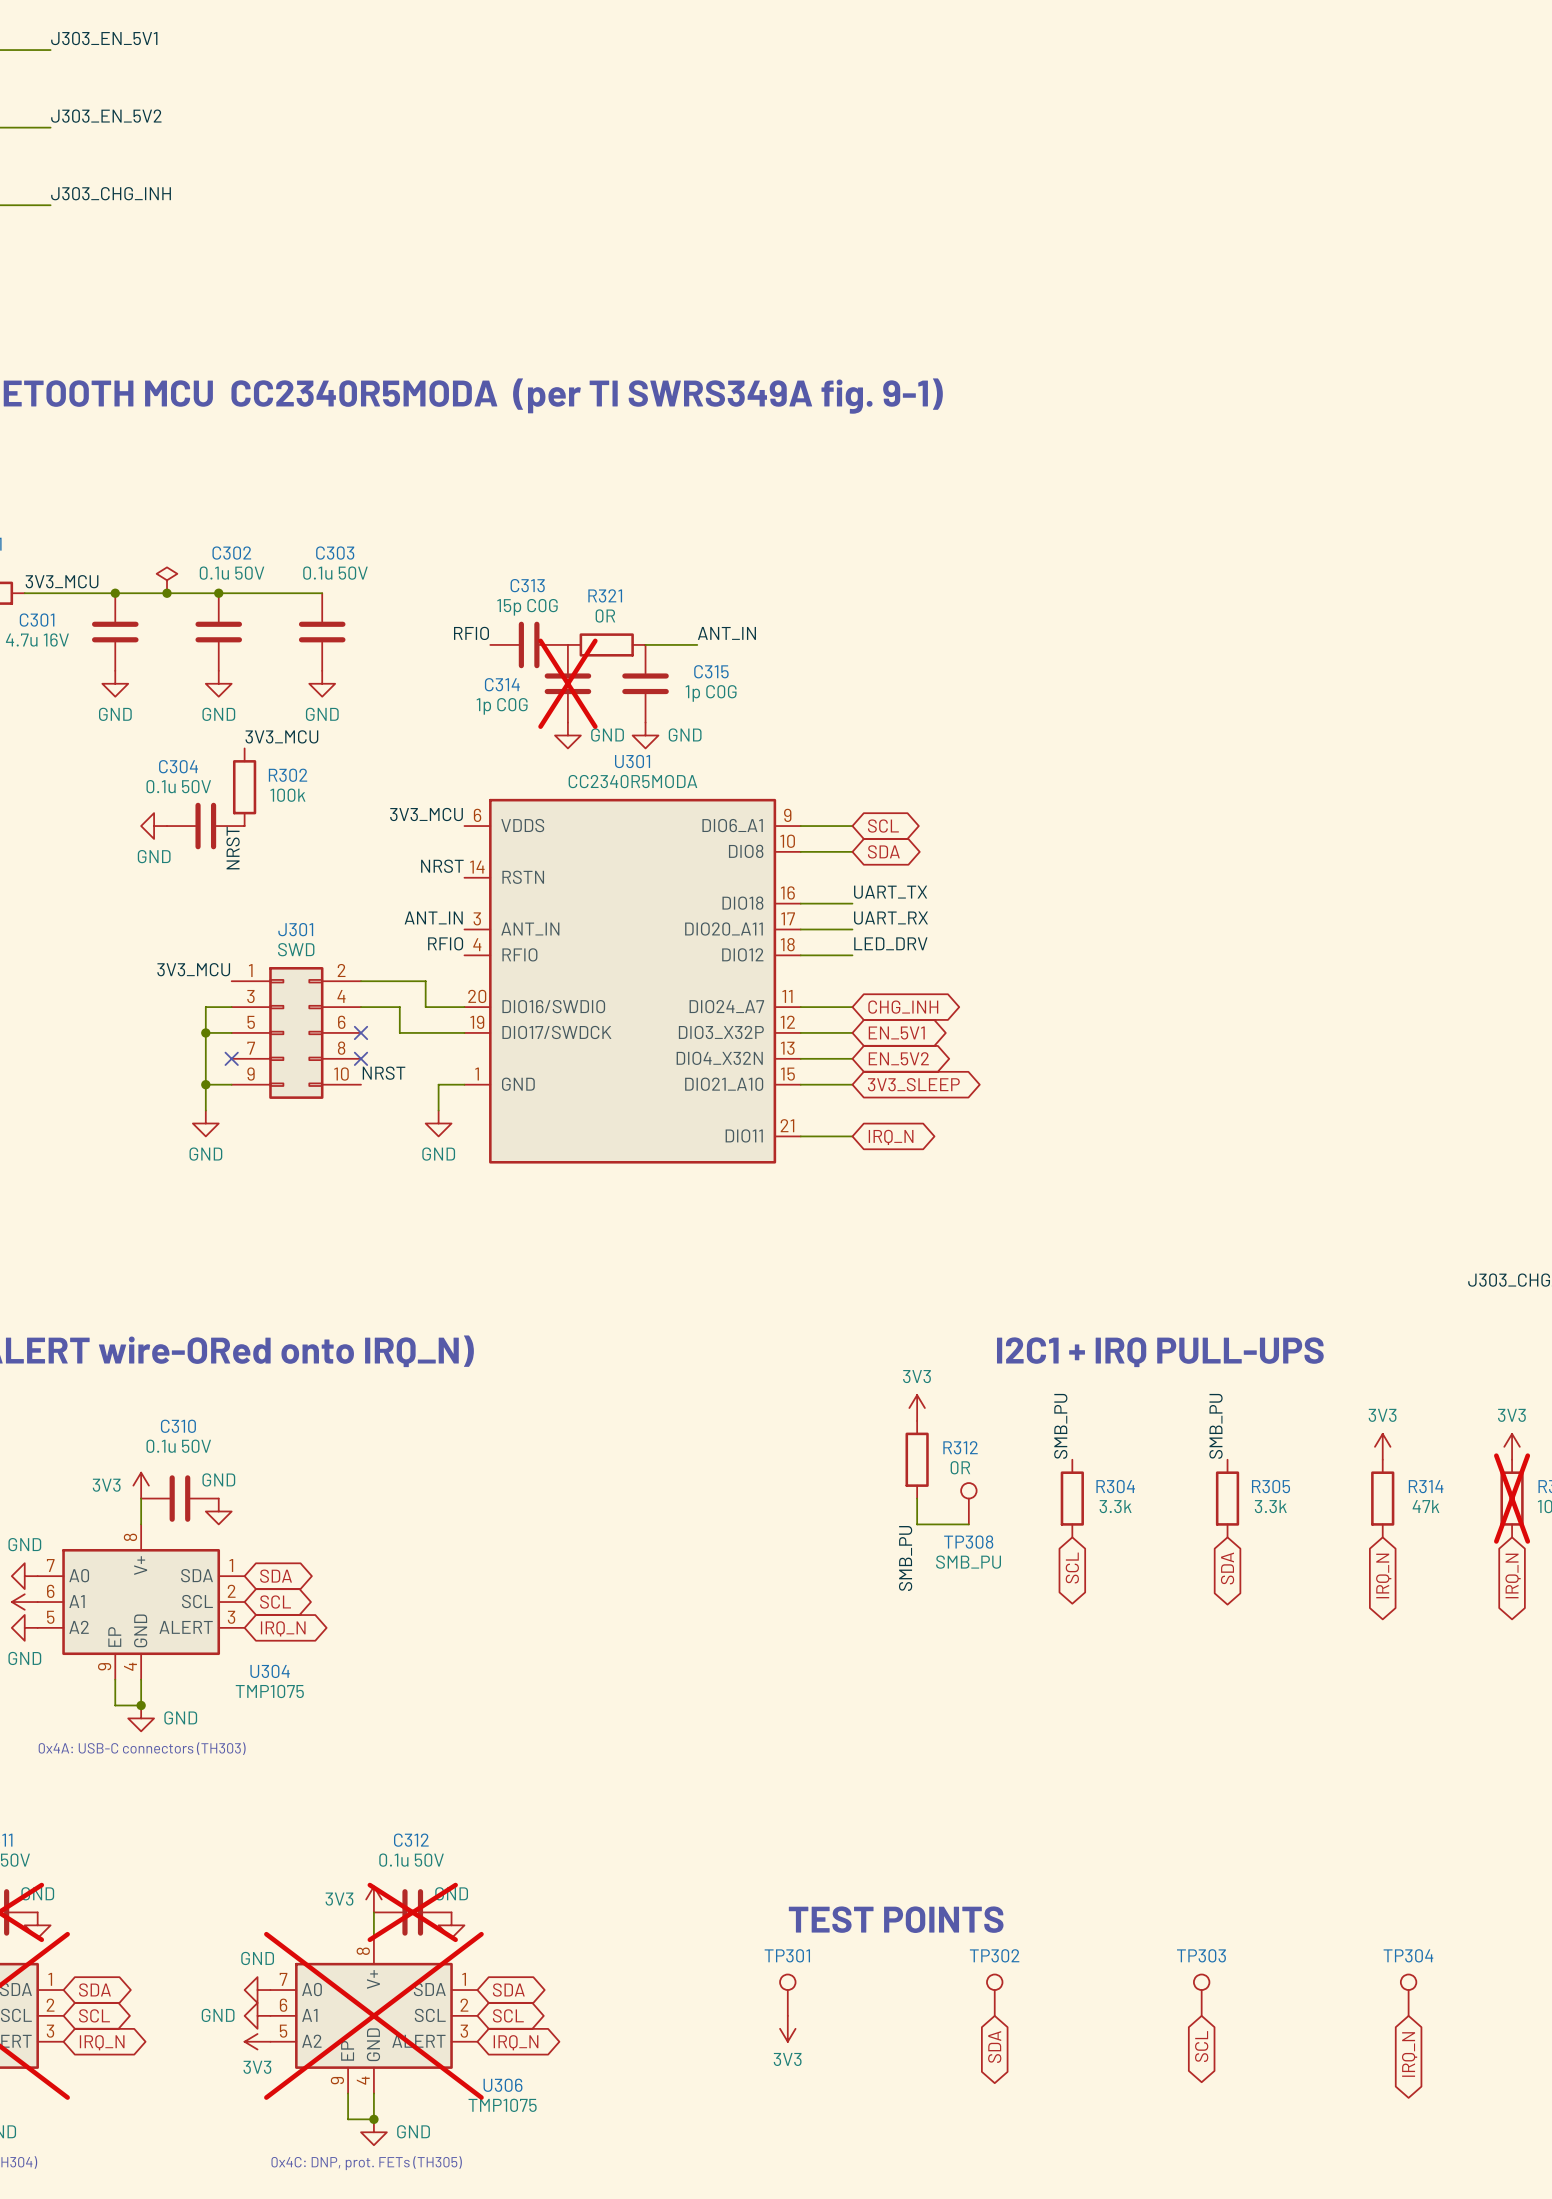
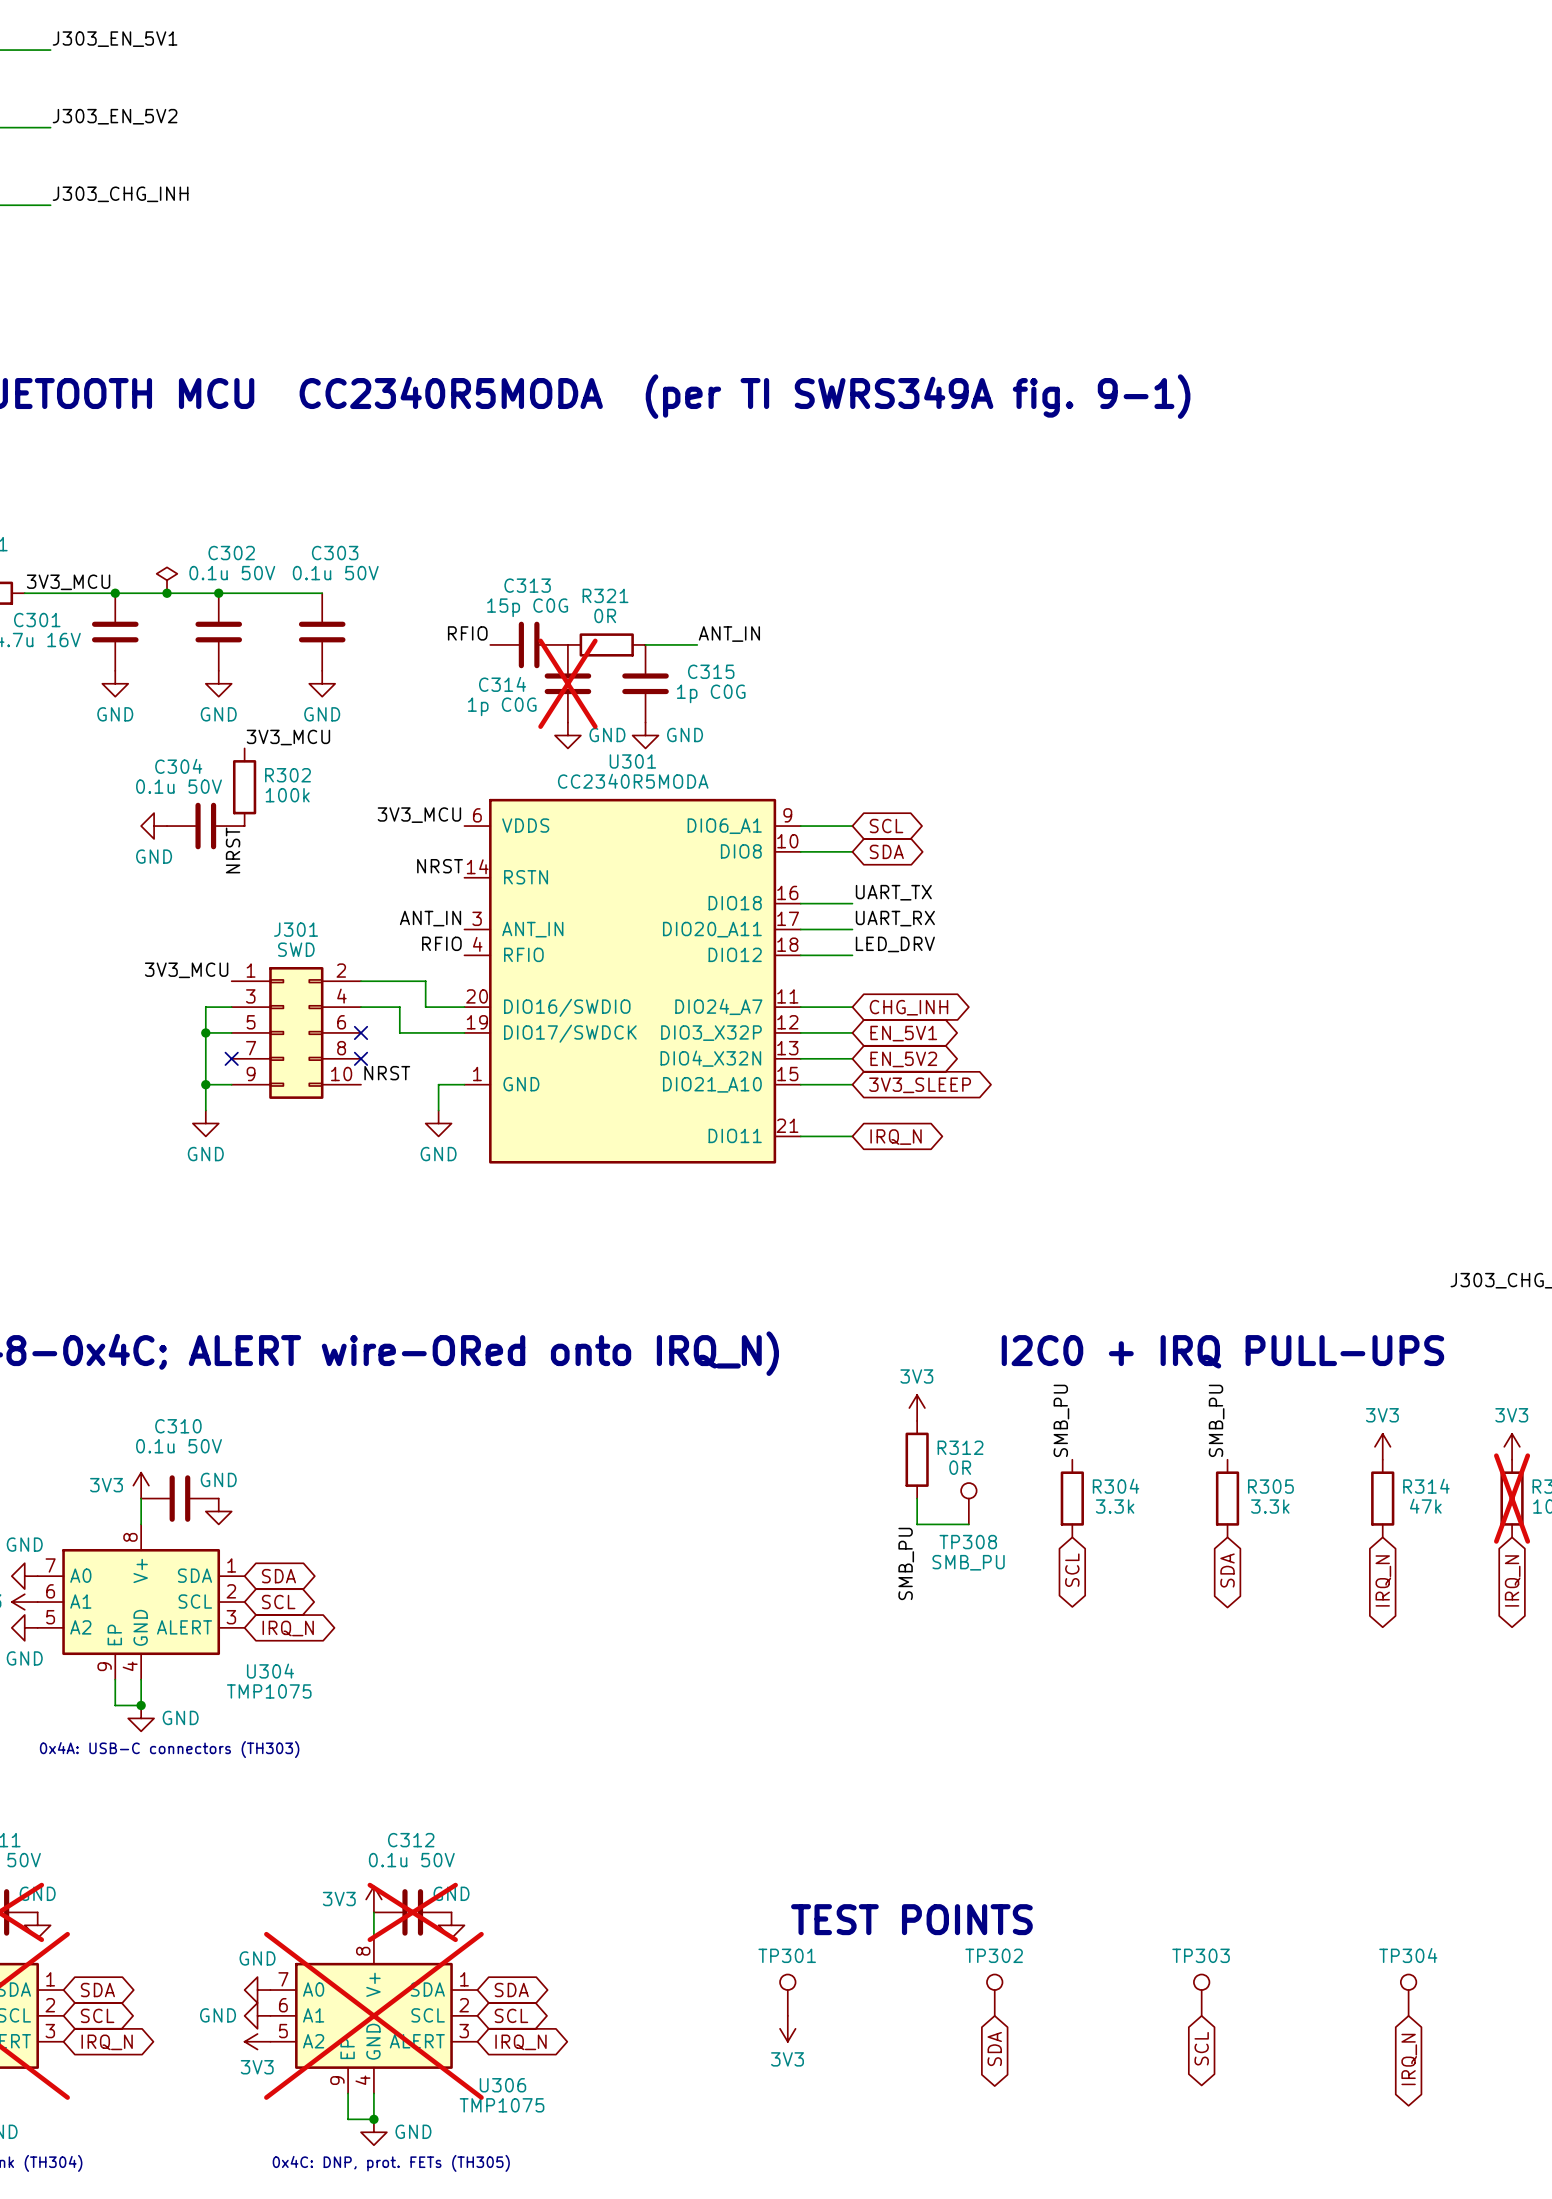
text: I2C1 + IRQ PULL-UPS (1160, 1352) -> I2C0 + IRQ PULL-UPS (1222, 1351)

